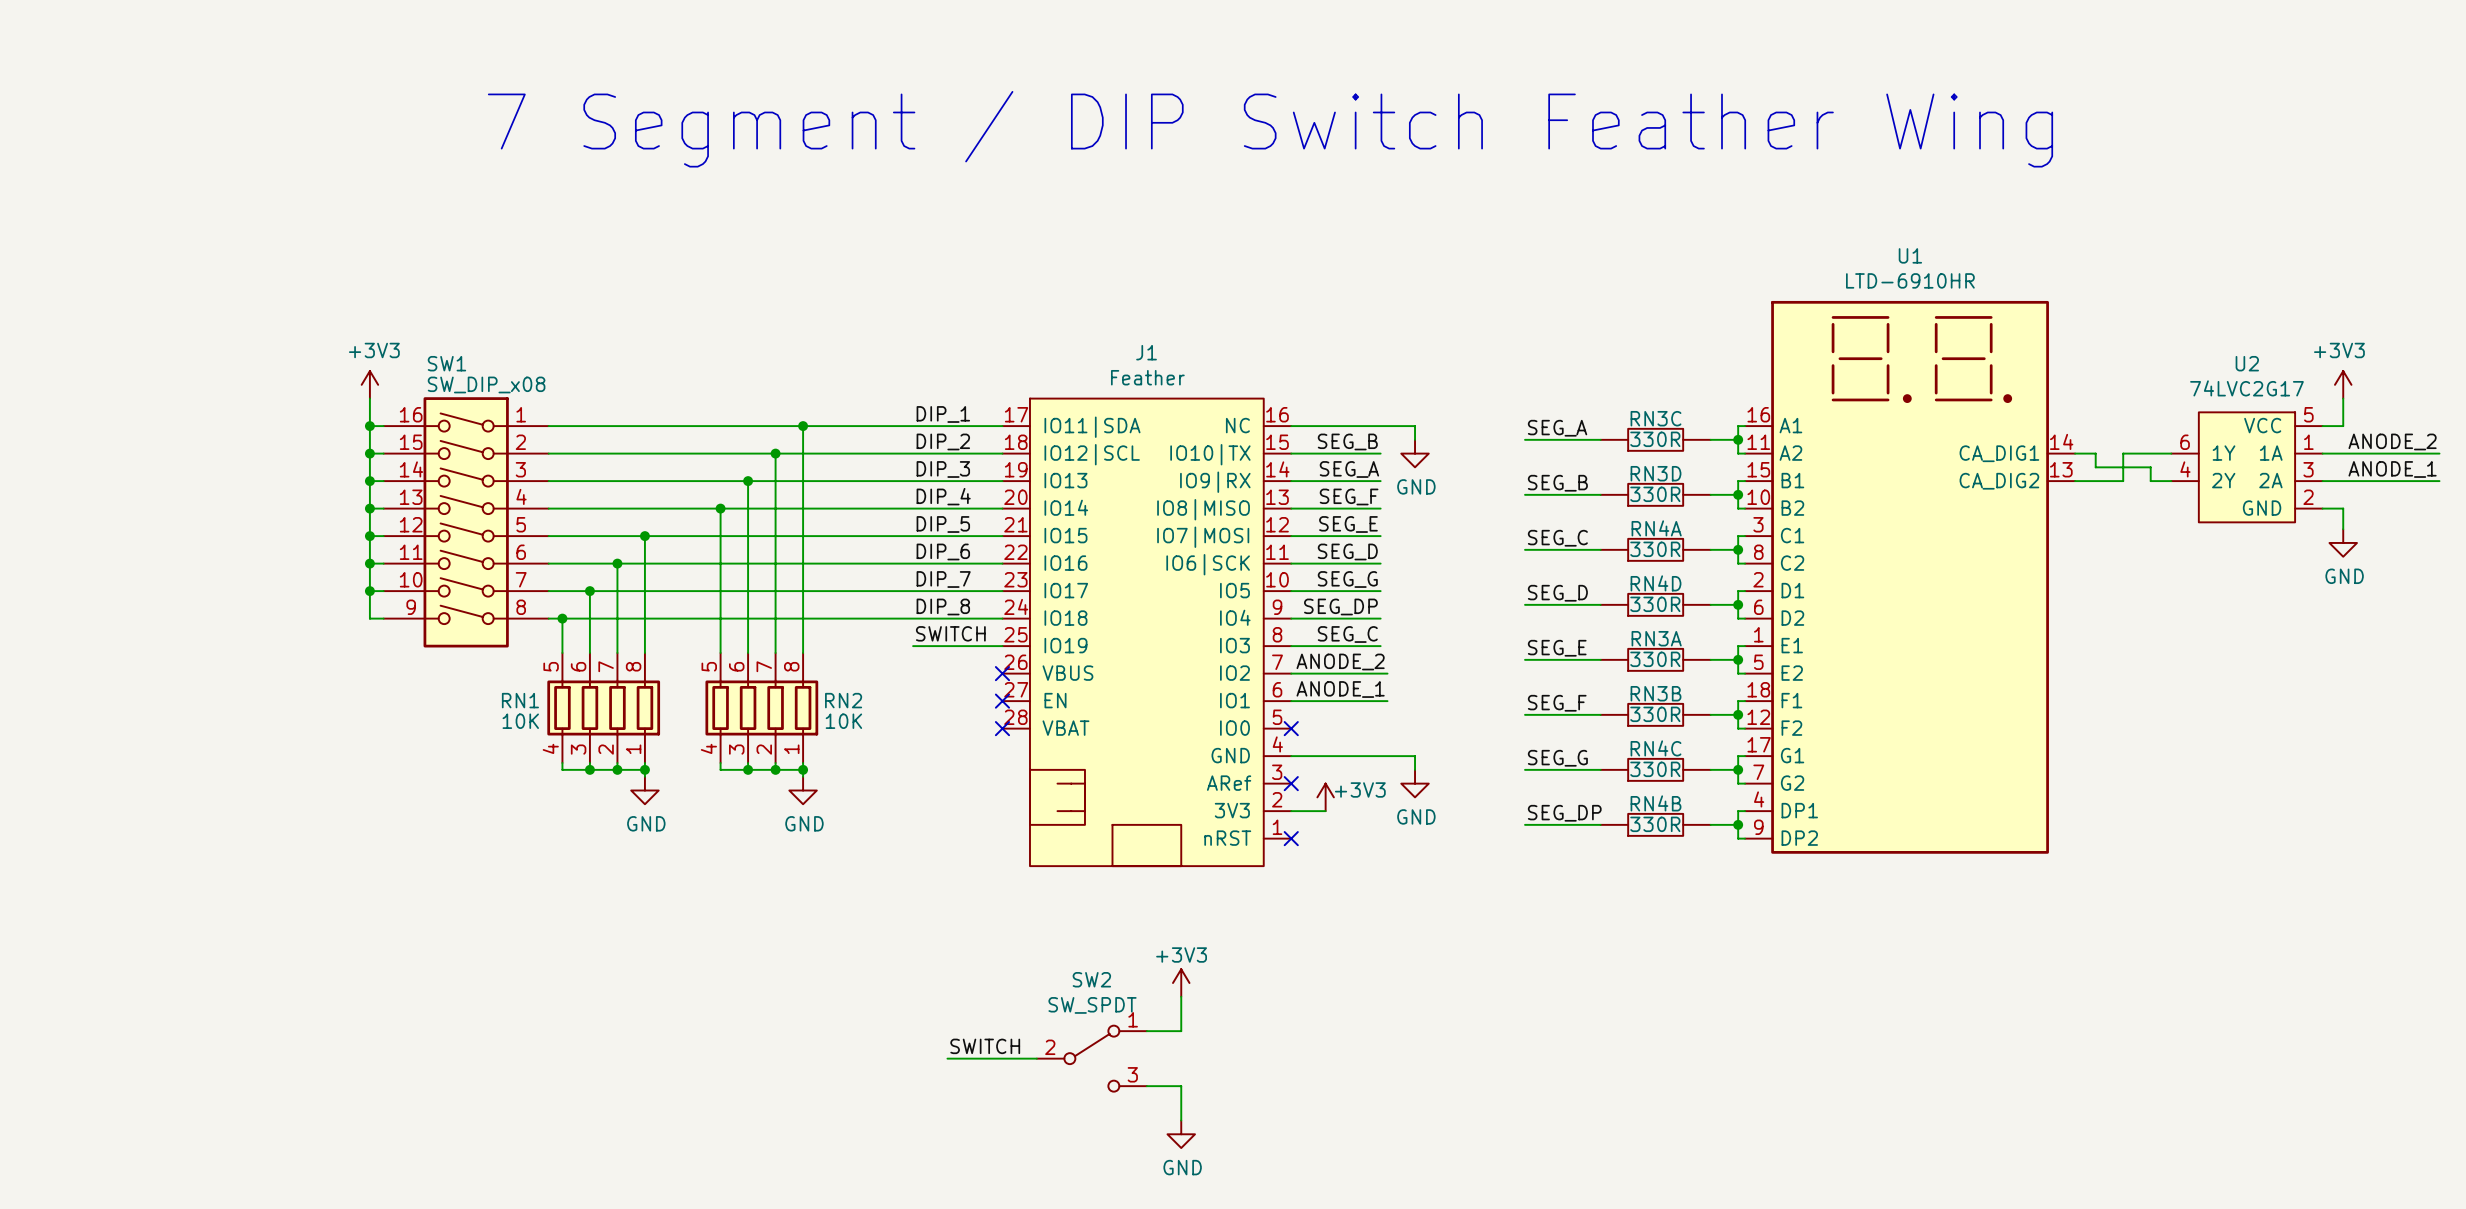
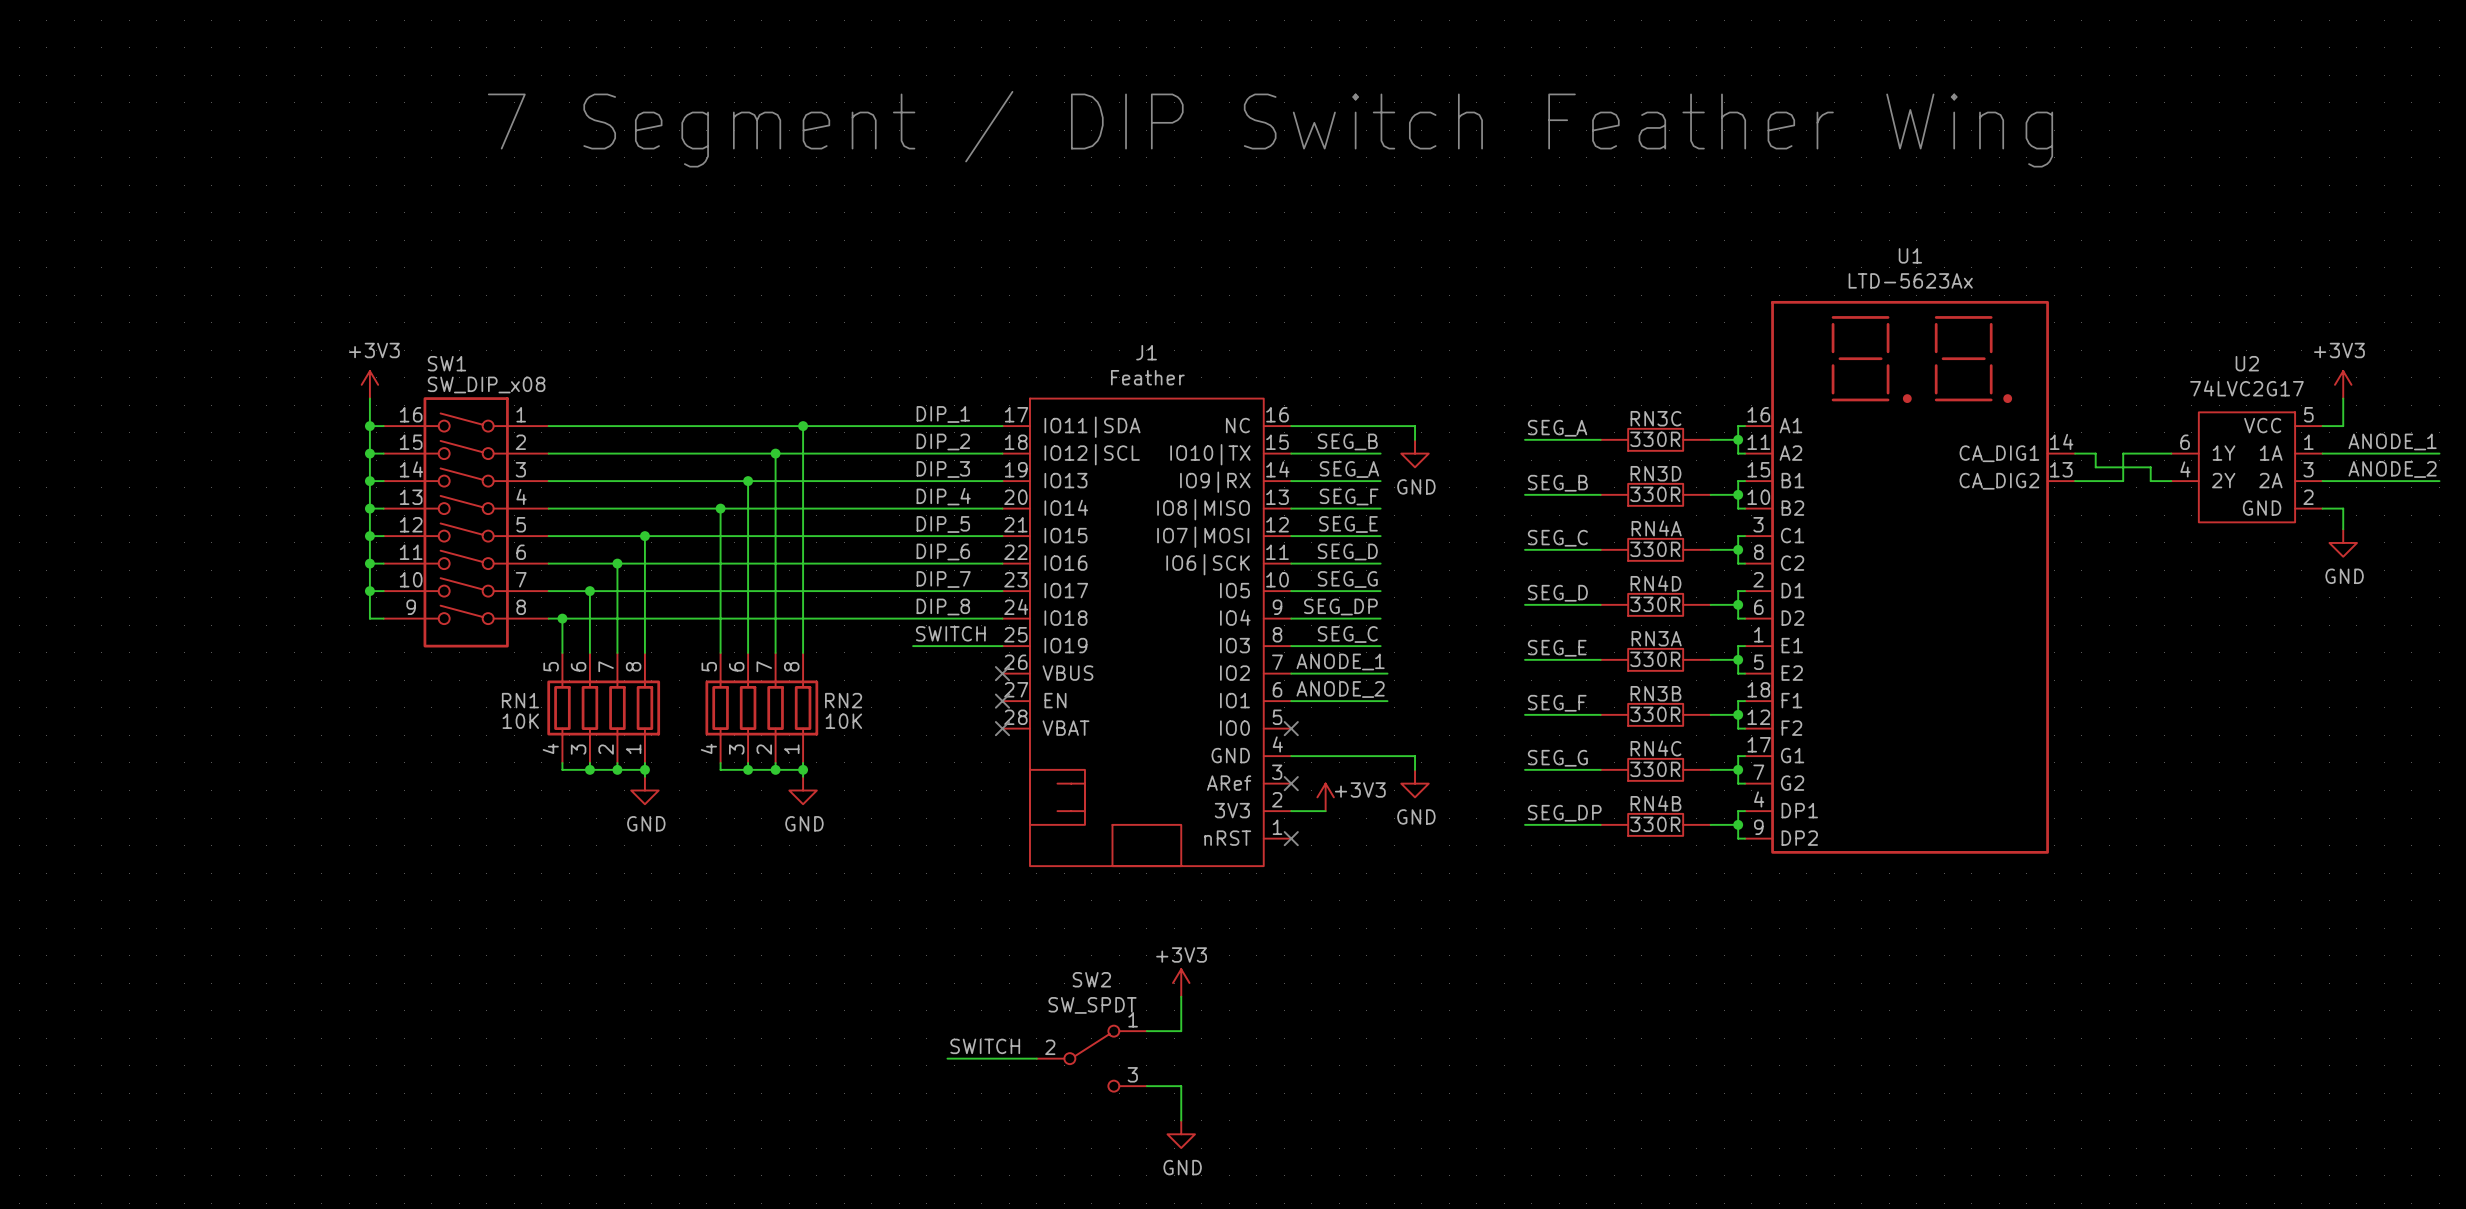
U1 value: LTD-6910HR (1910, 280) -> LTD-5623Ax (1910, 280)
label: ANODE_2 (2392, 441) -> ANODE_1 (2392, 441)
label: ANODE_1 (2392, 469) -> ANODE_2 (2392, 469)
label: ANODE_2 (1340, 661) -> ANODE_1 (1340, 661)
label: ANODE_1 (1340, 689) -> ANODE_2 (1340, 689)

